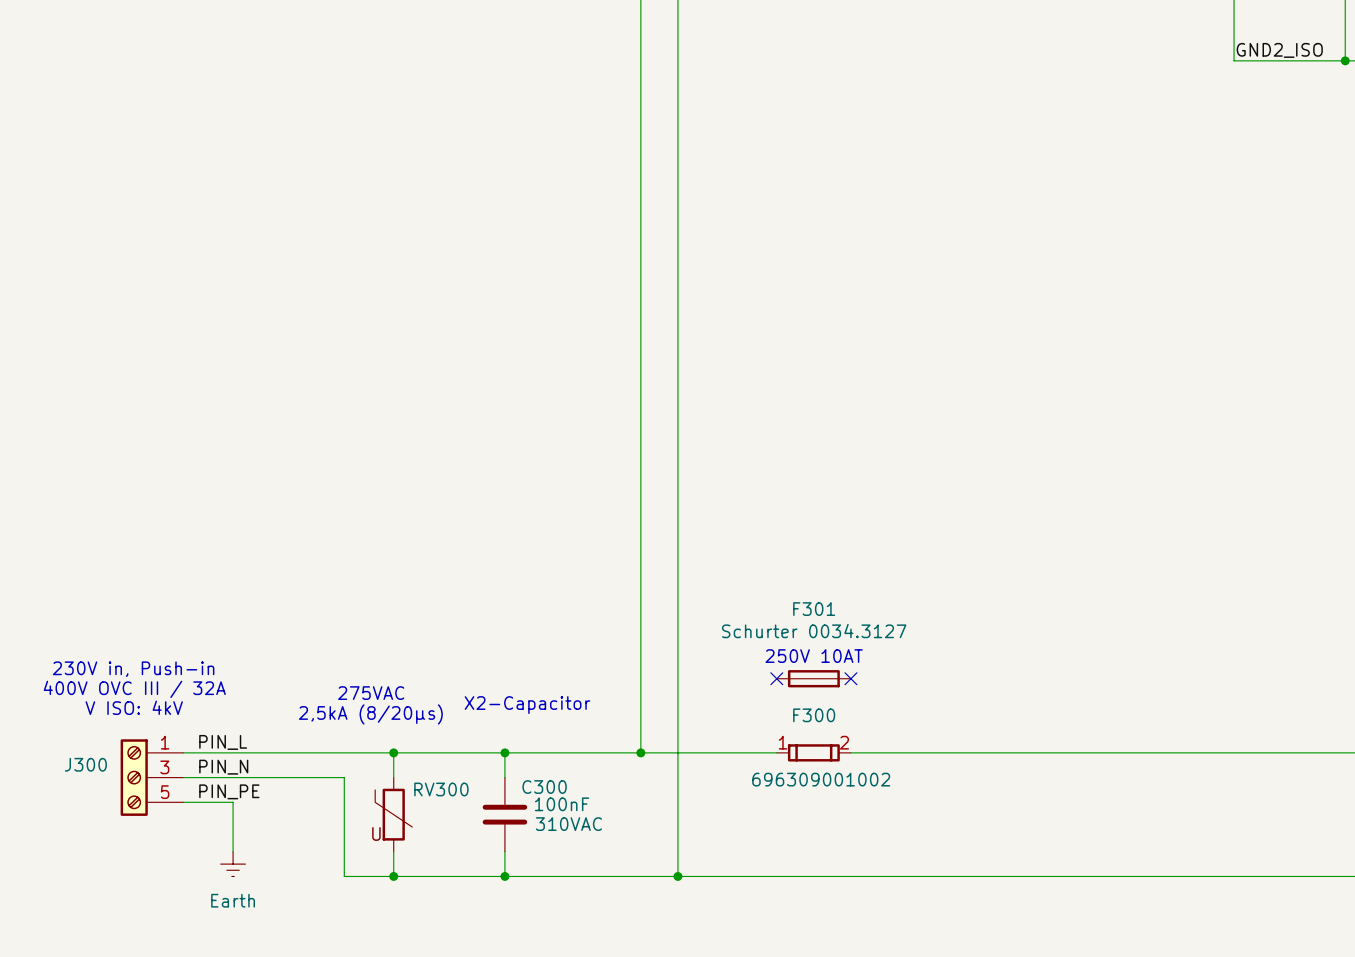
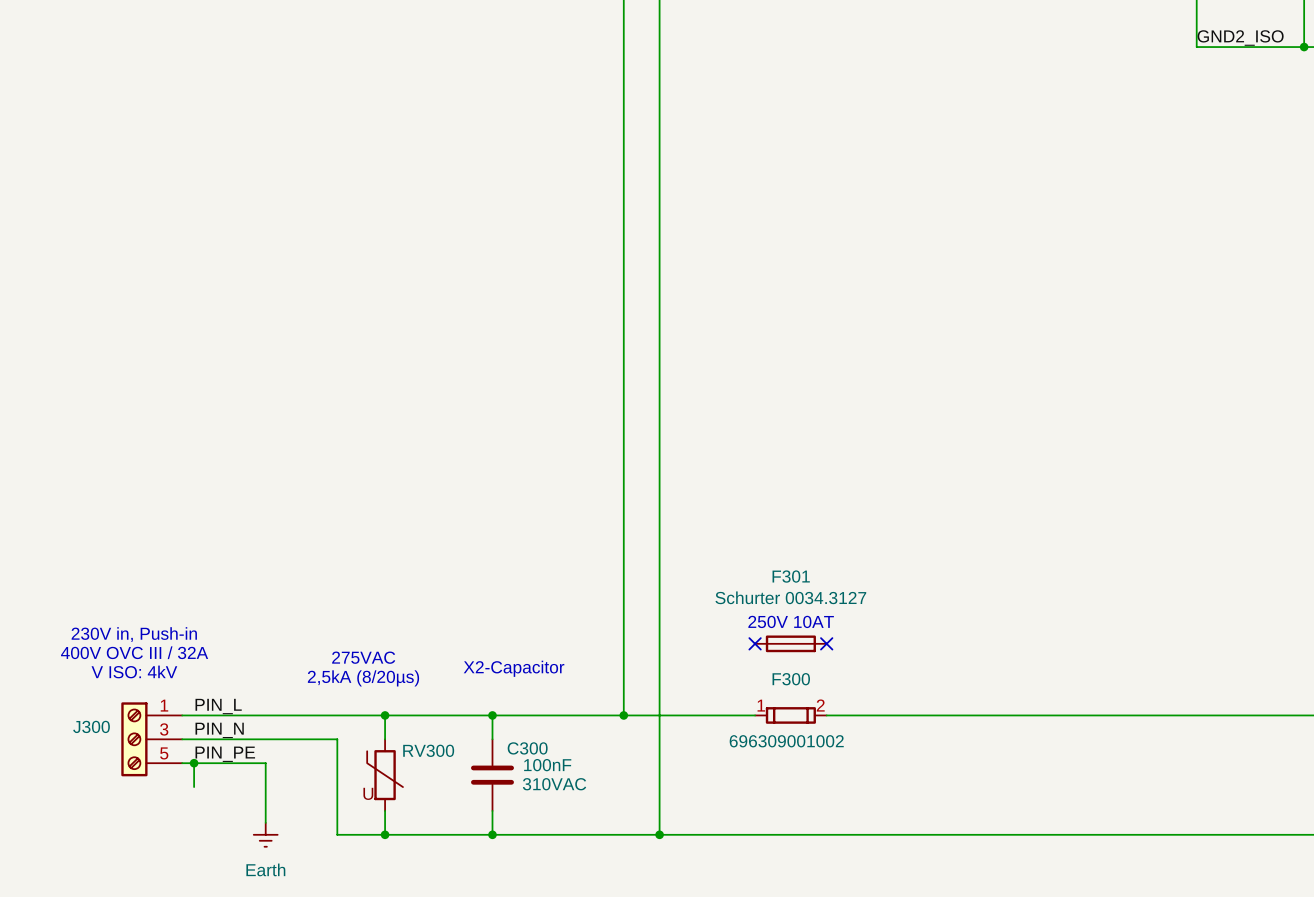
wire: none -> (194, 763) (194, 787)
junction: none -> (194, 763)
wire: (233, 802) (233, 851) -> (229, 763) (265, 763) (265, 822)
power symbol position: Earth (233, 864) -> Earth (265, 834)

